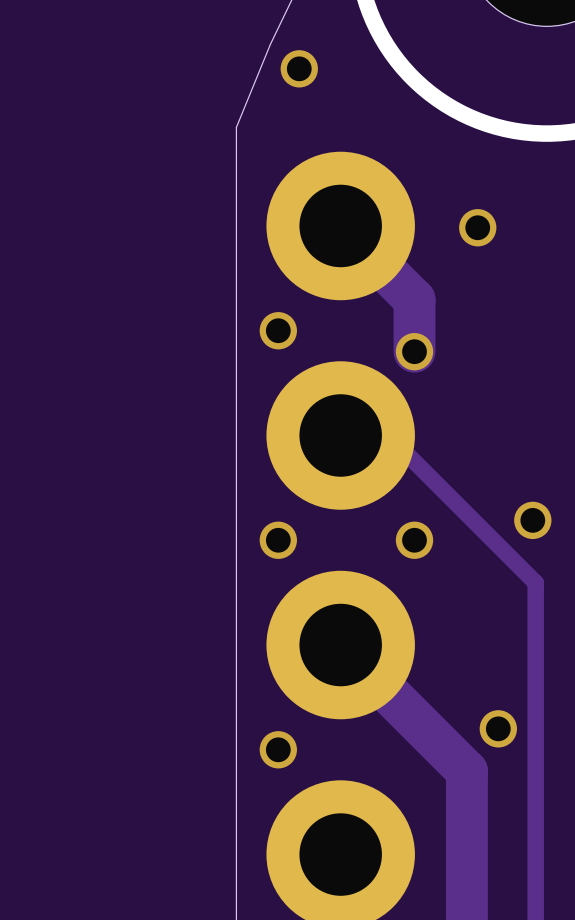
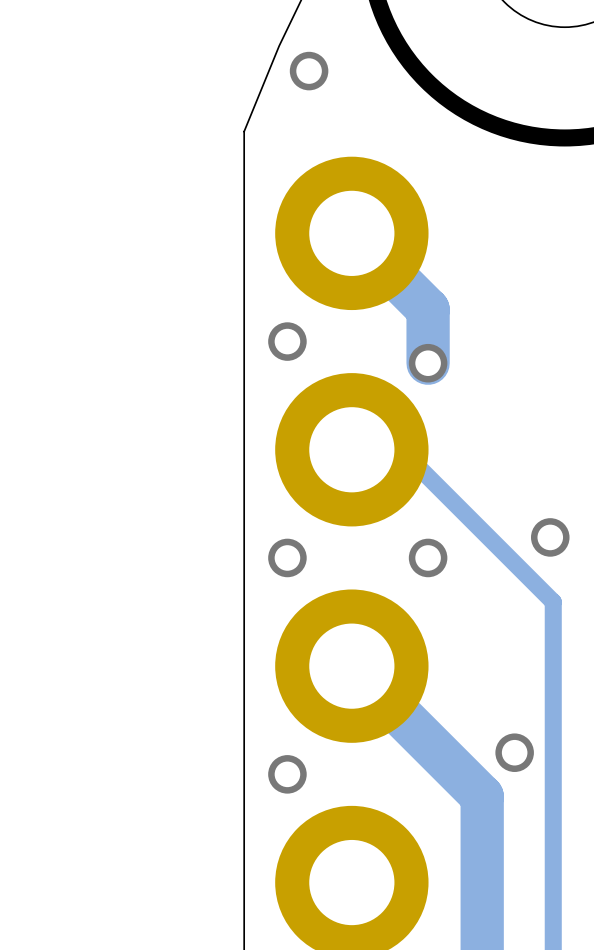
via: (477, 227) -> none

